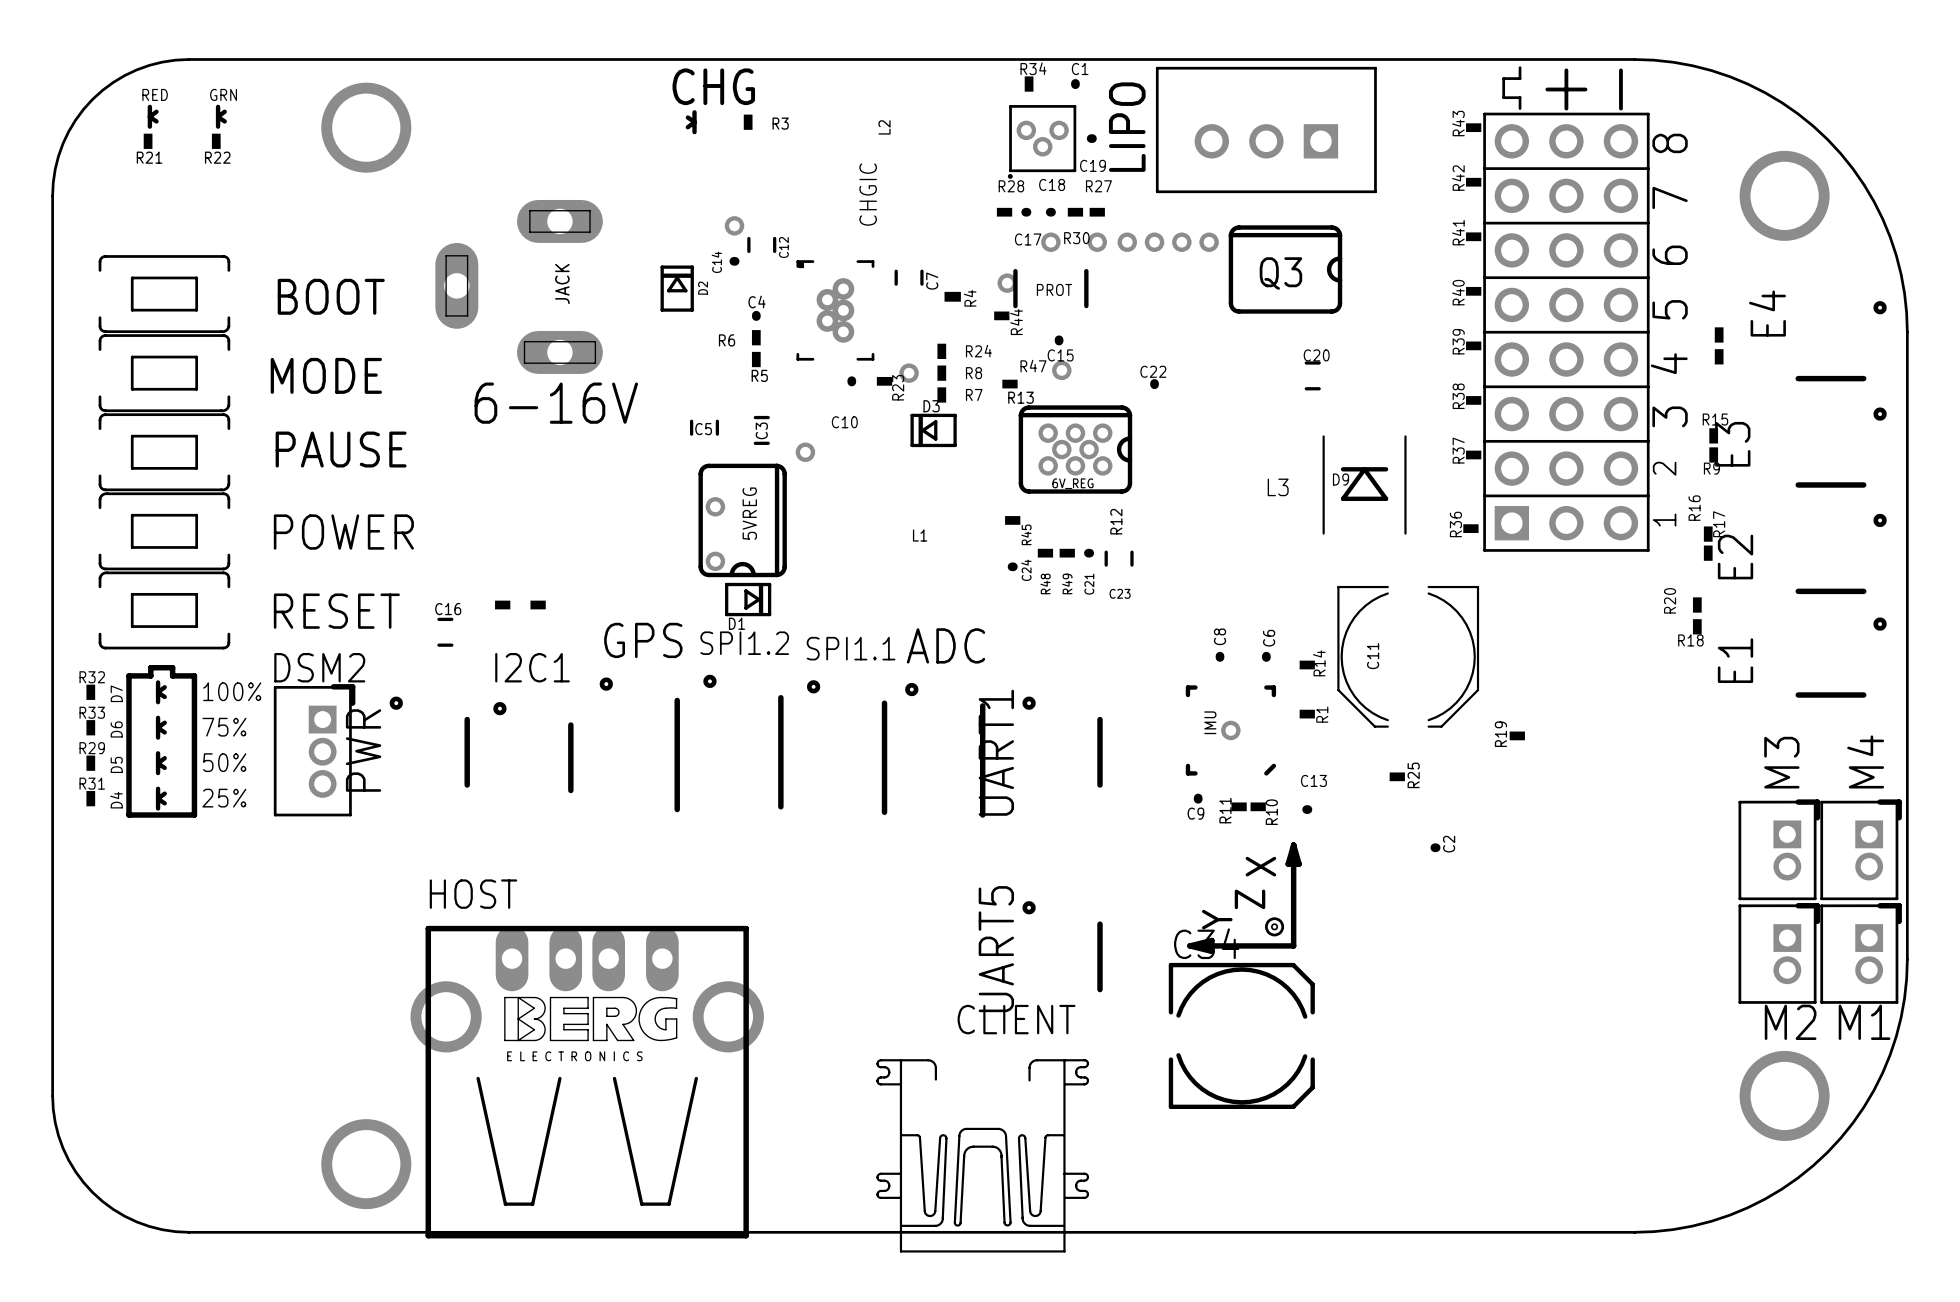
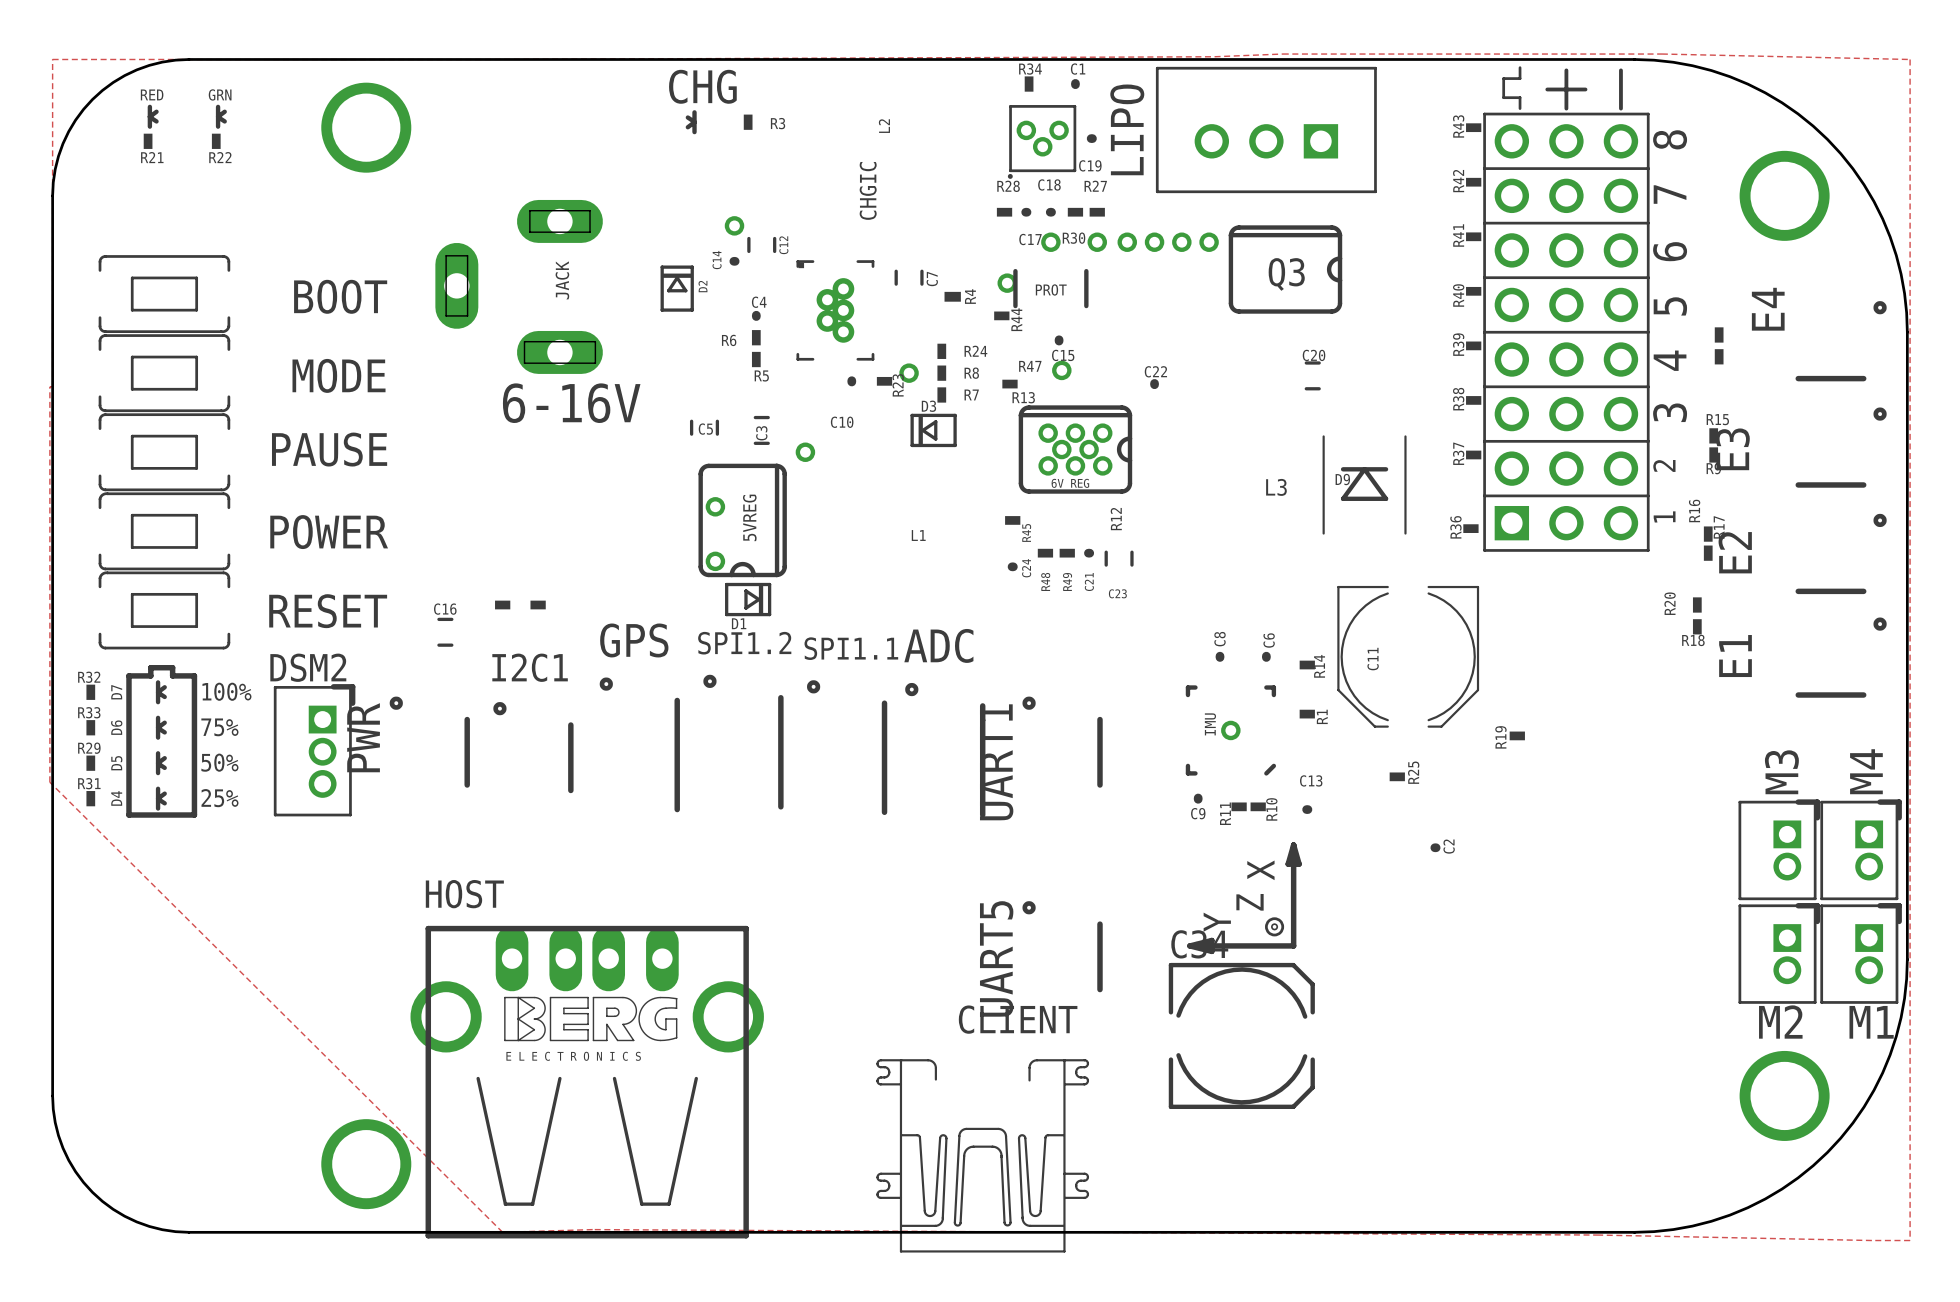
zone outline: none -> (1282, 54) (1214, 56) (52, 59) (49, 782) (502, 1232) (592, 1229) (1599, 1235) (1910, 1240) (1910, 59) (1661, 54) (1282, 54)

